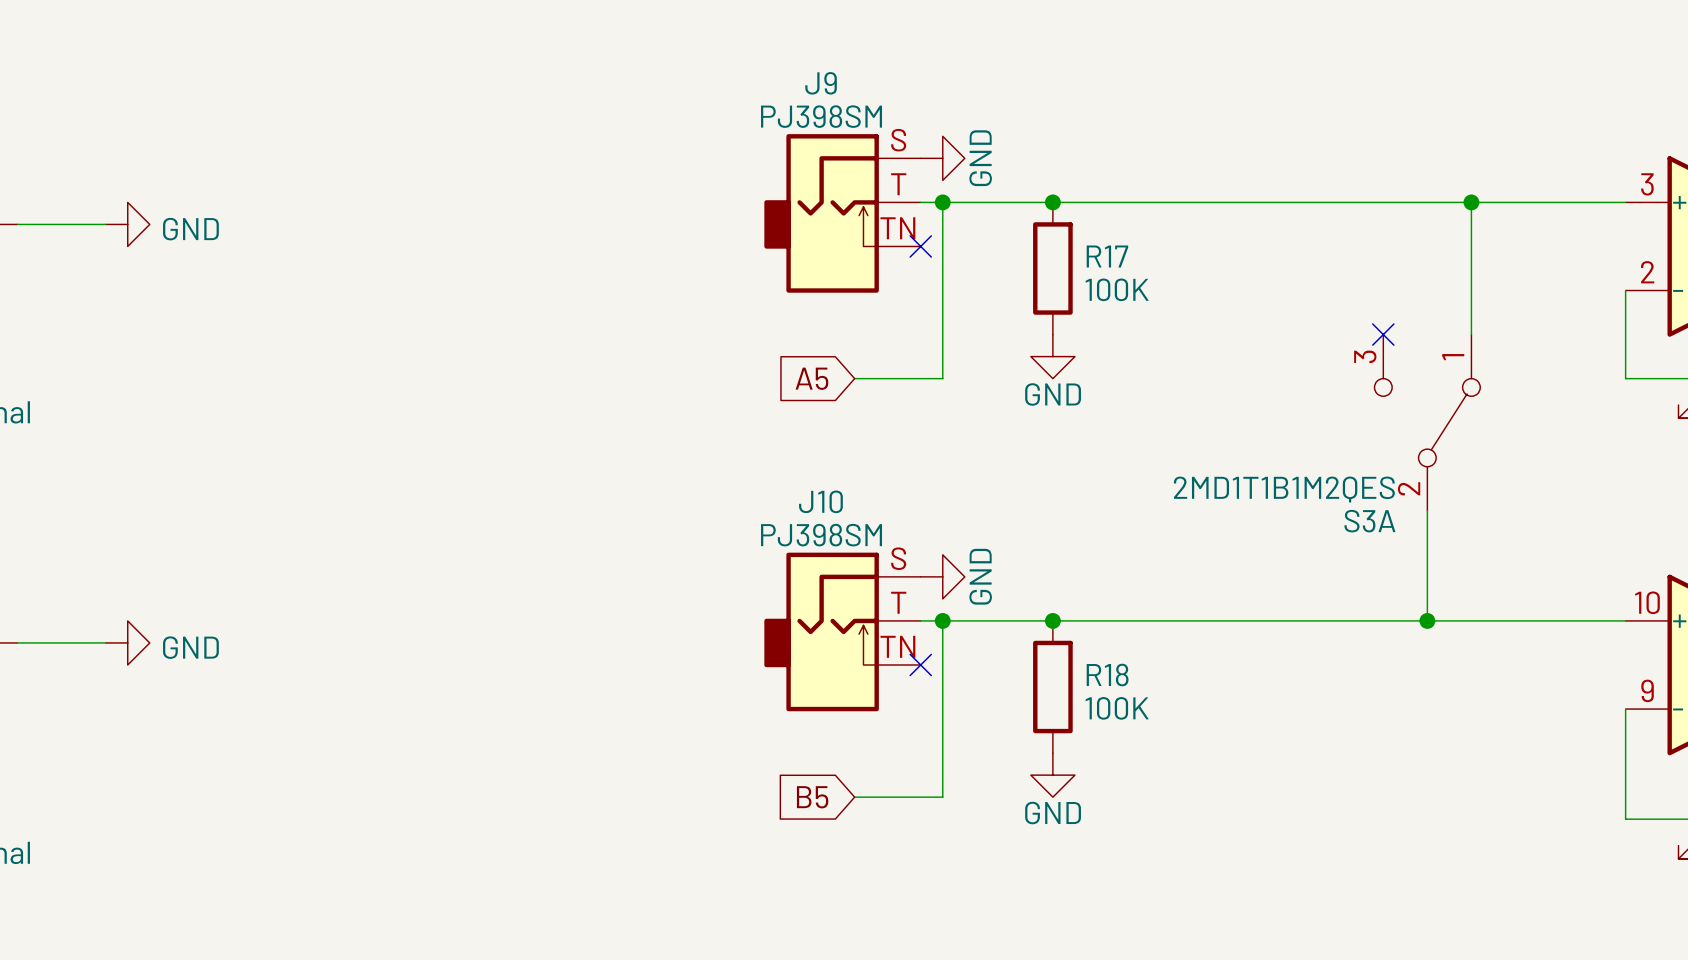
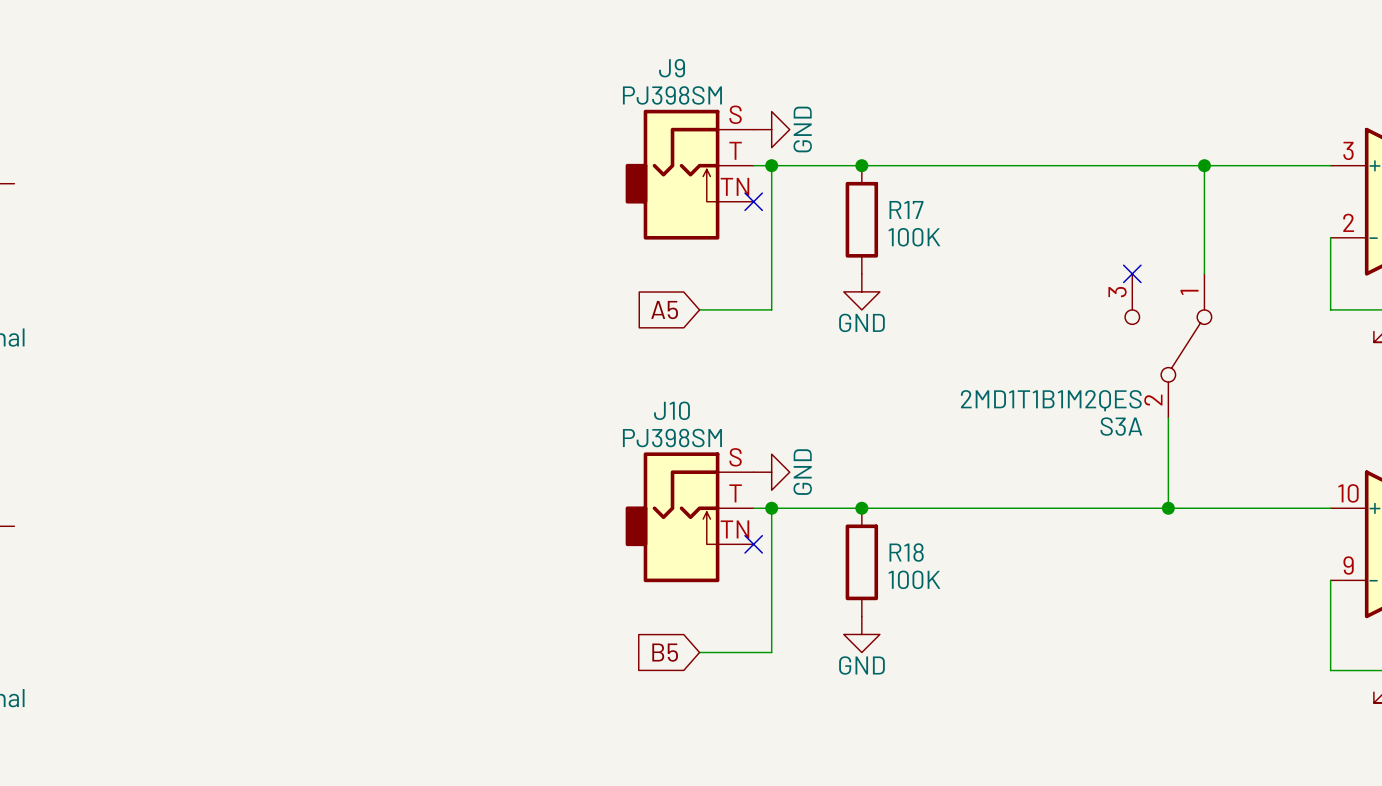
wire: (17, 224) (105, 224) -> none
power symbol: GND (127, 224) -> none
wire: (17, 642) (105, 642) -> none
power symbol: GND (127, 642) -> none

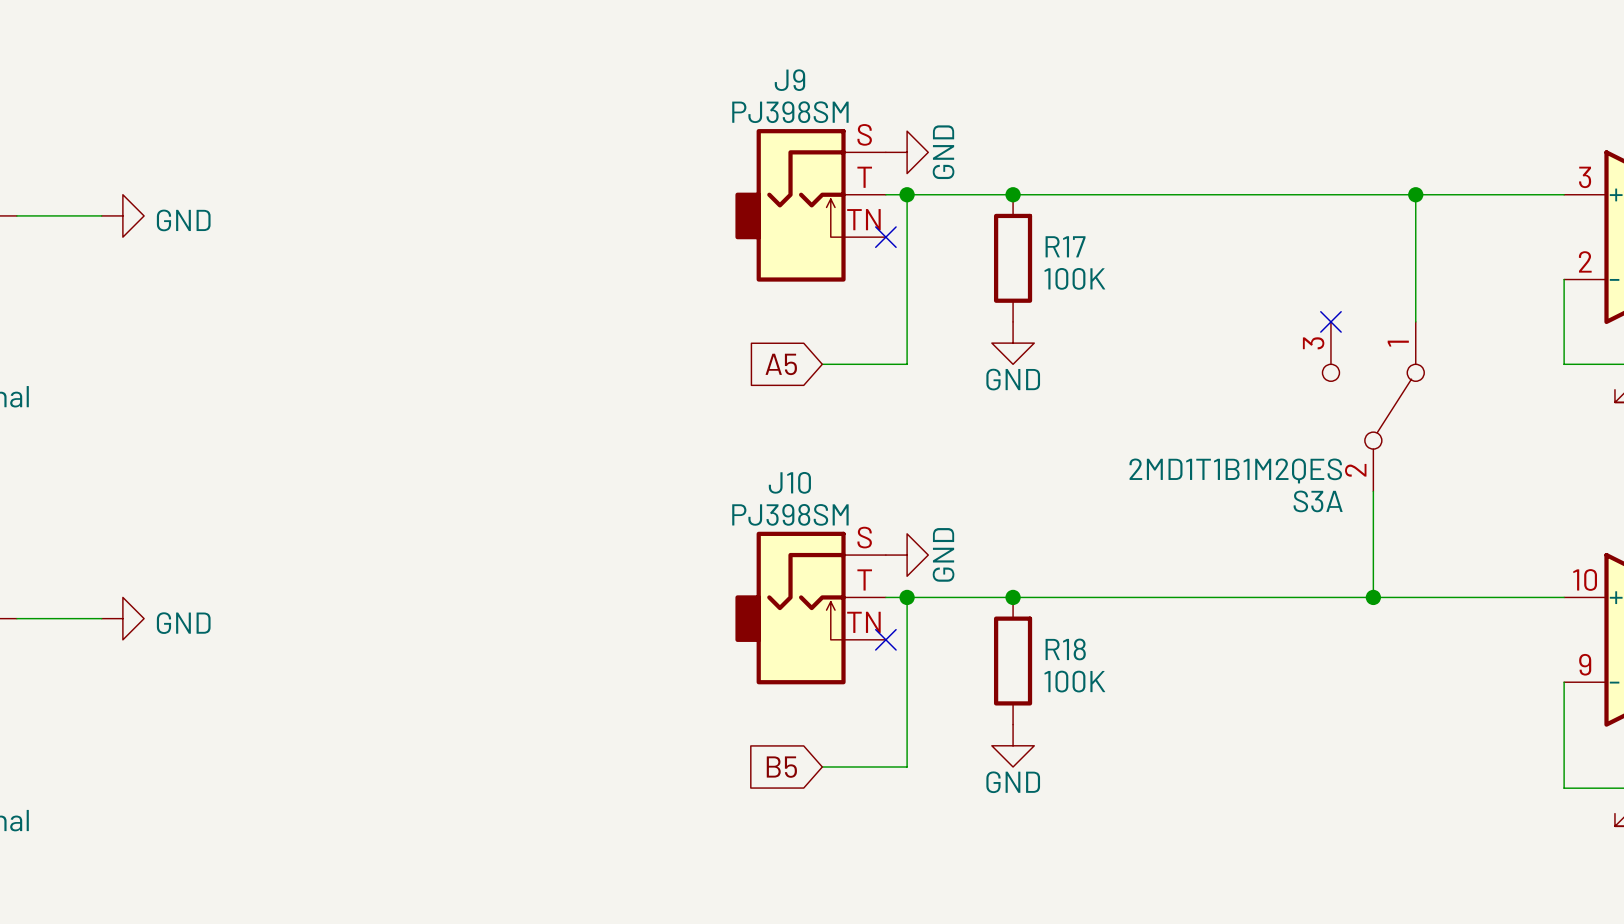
wire: none -> (16, 215) (101, 215)
power symbol: none -> GND (122, 215)
wire: none -> (16, 618) (101, 618)
power symbol: none -> GND (122, 618)

